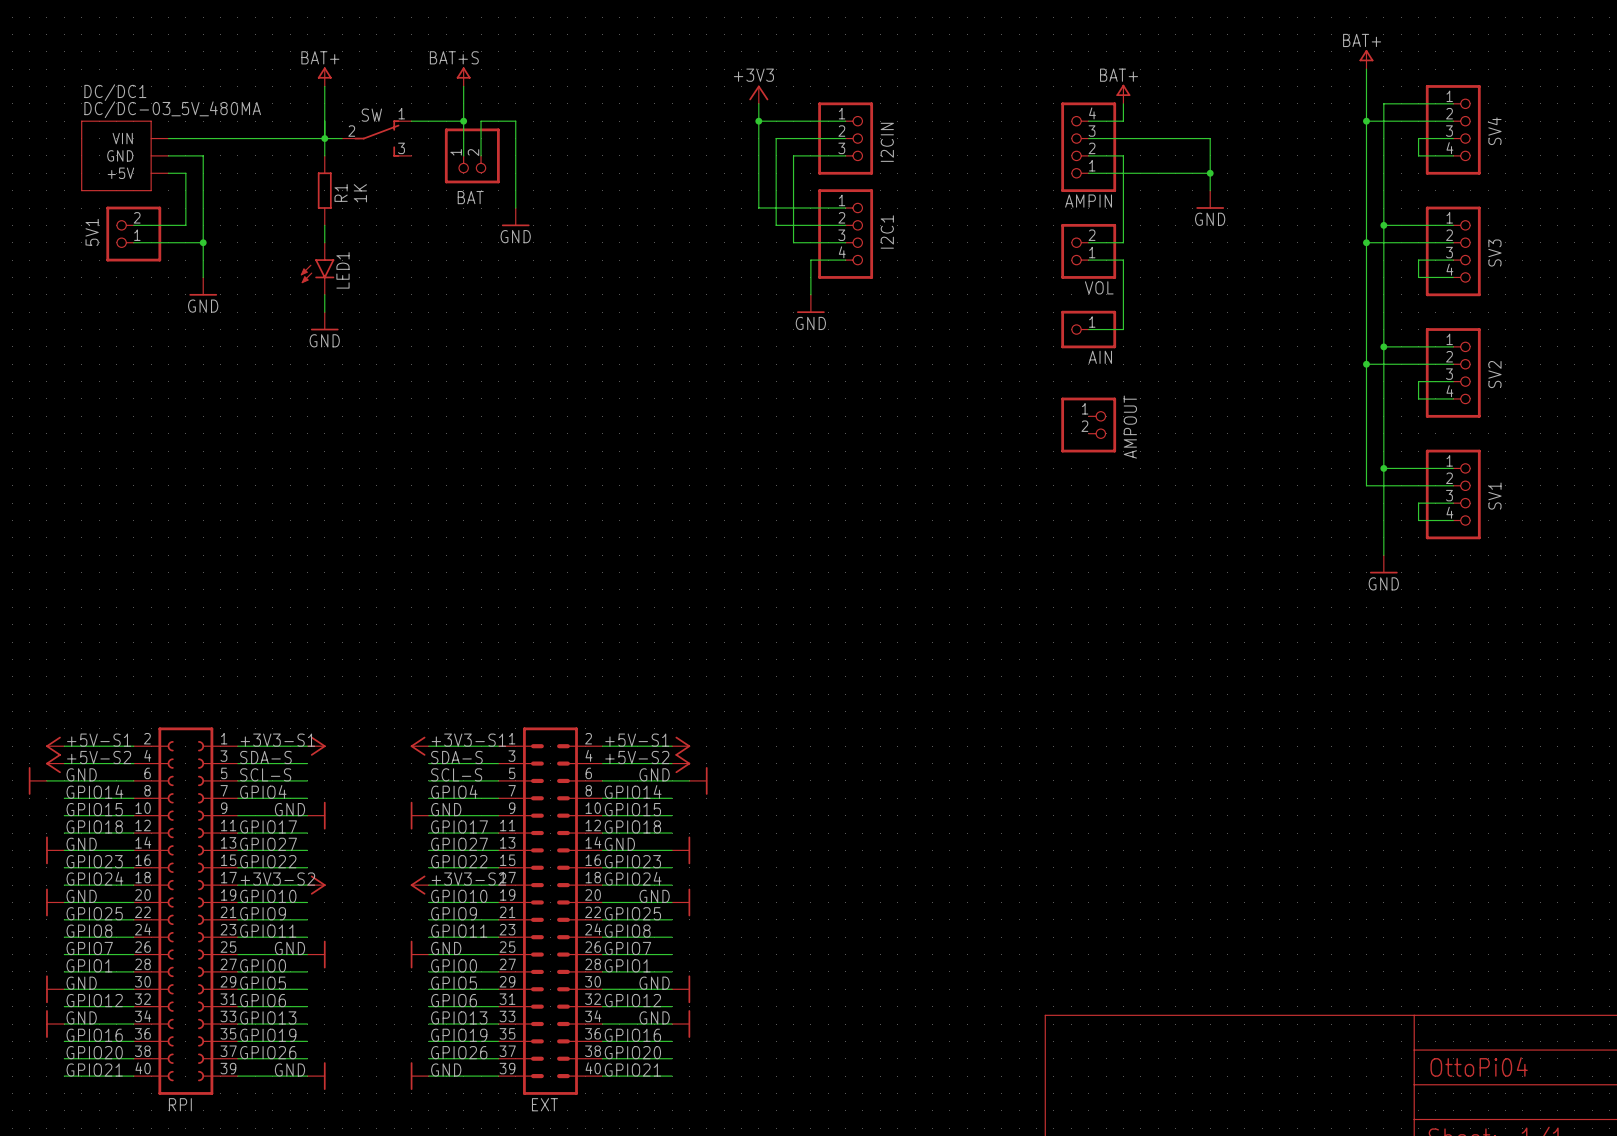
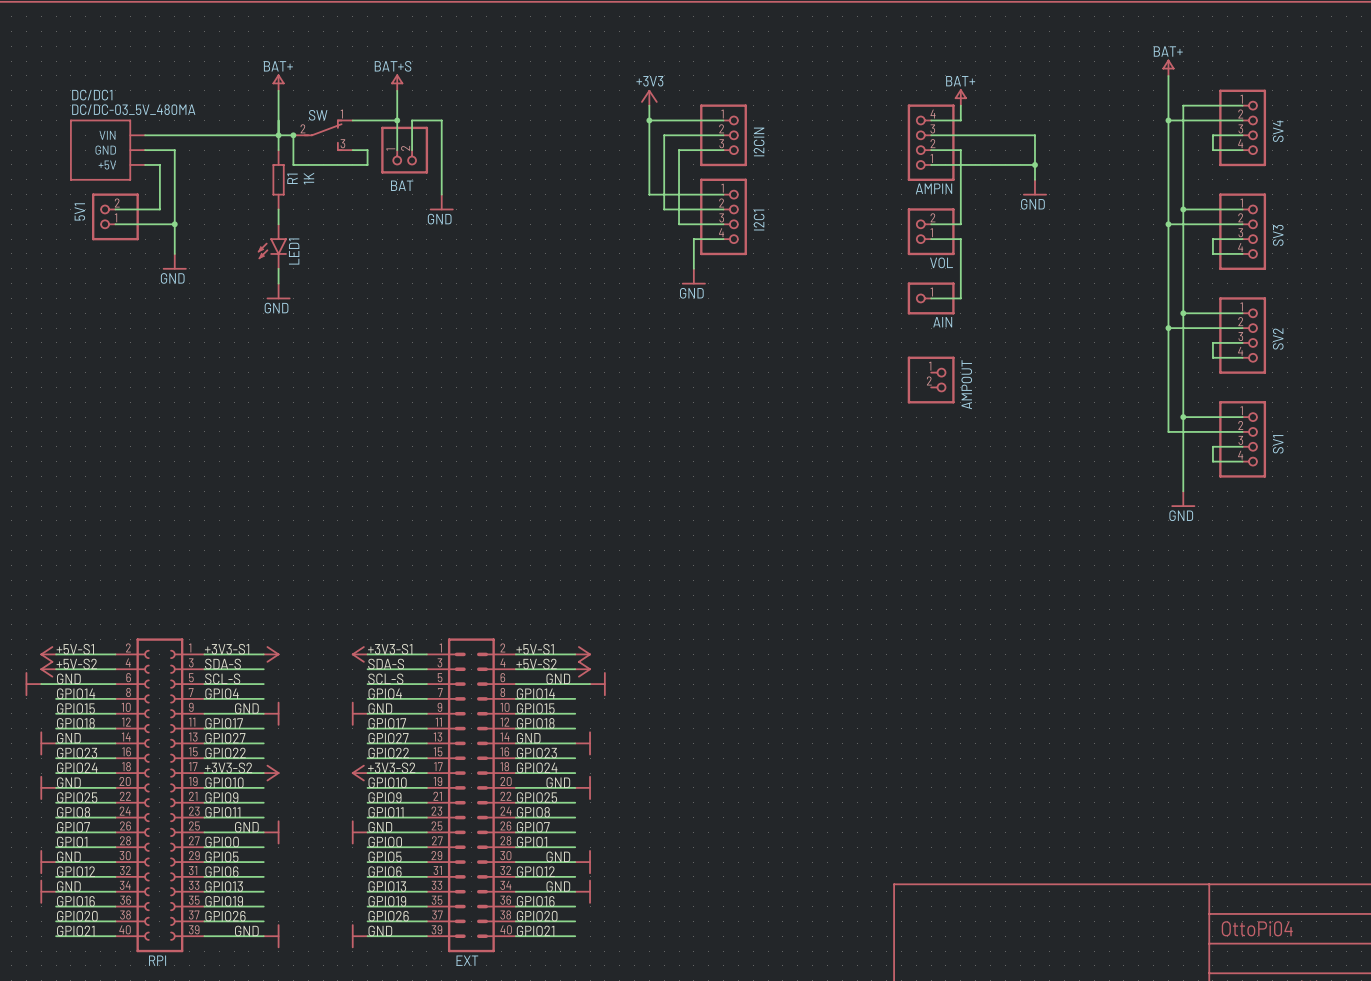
wire: none -> (293, 135) (293, 164) (367, 164) (367, 150) (352, 150)
junction: none -> (293, 135)

